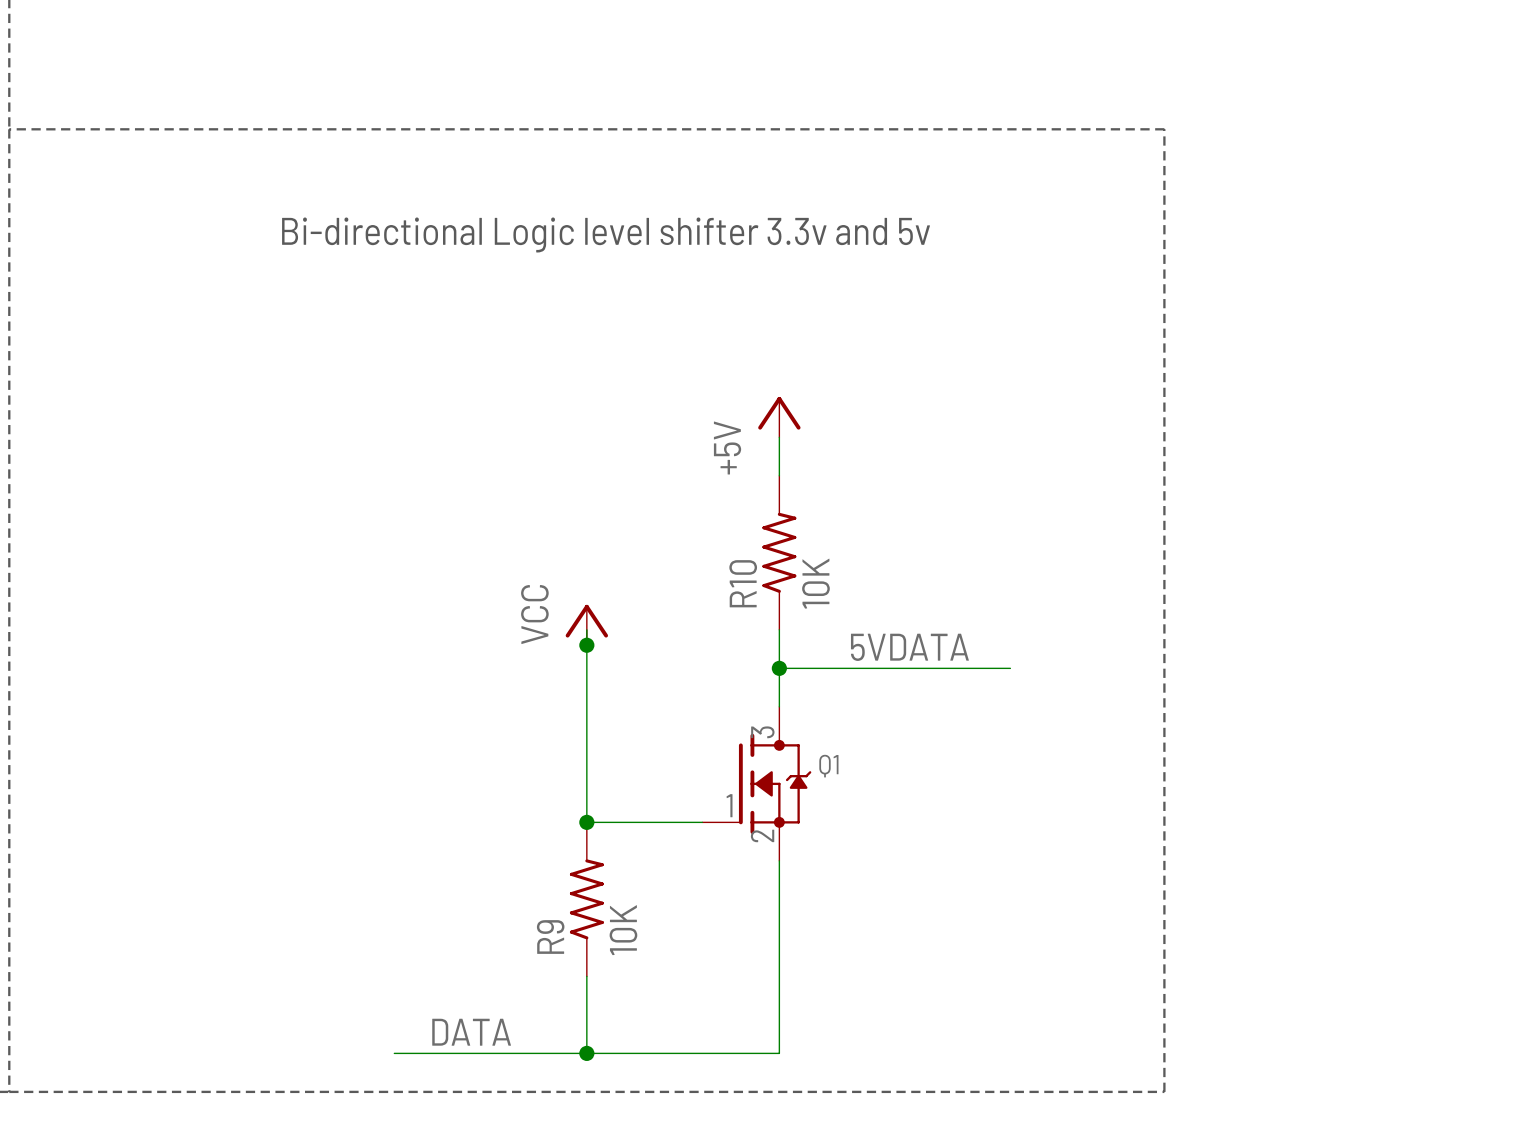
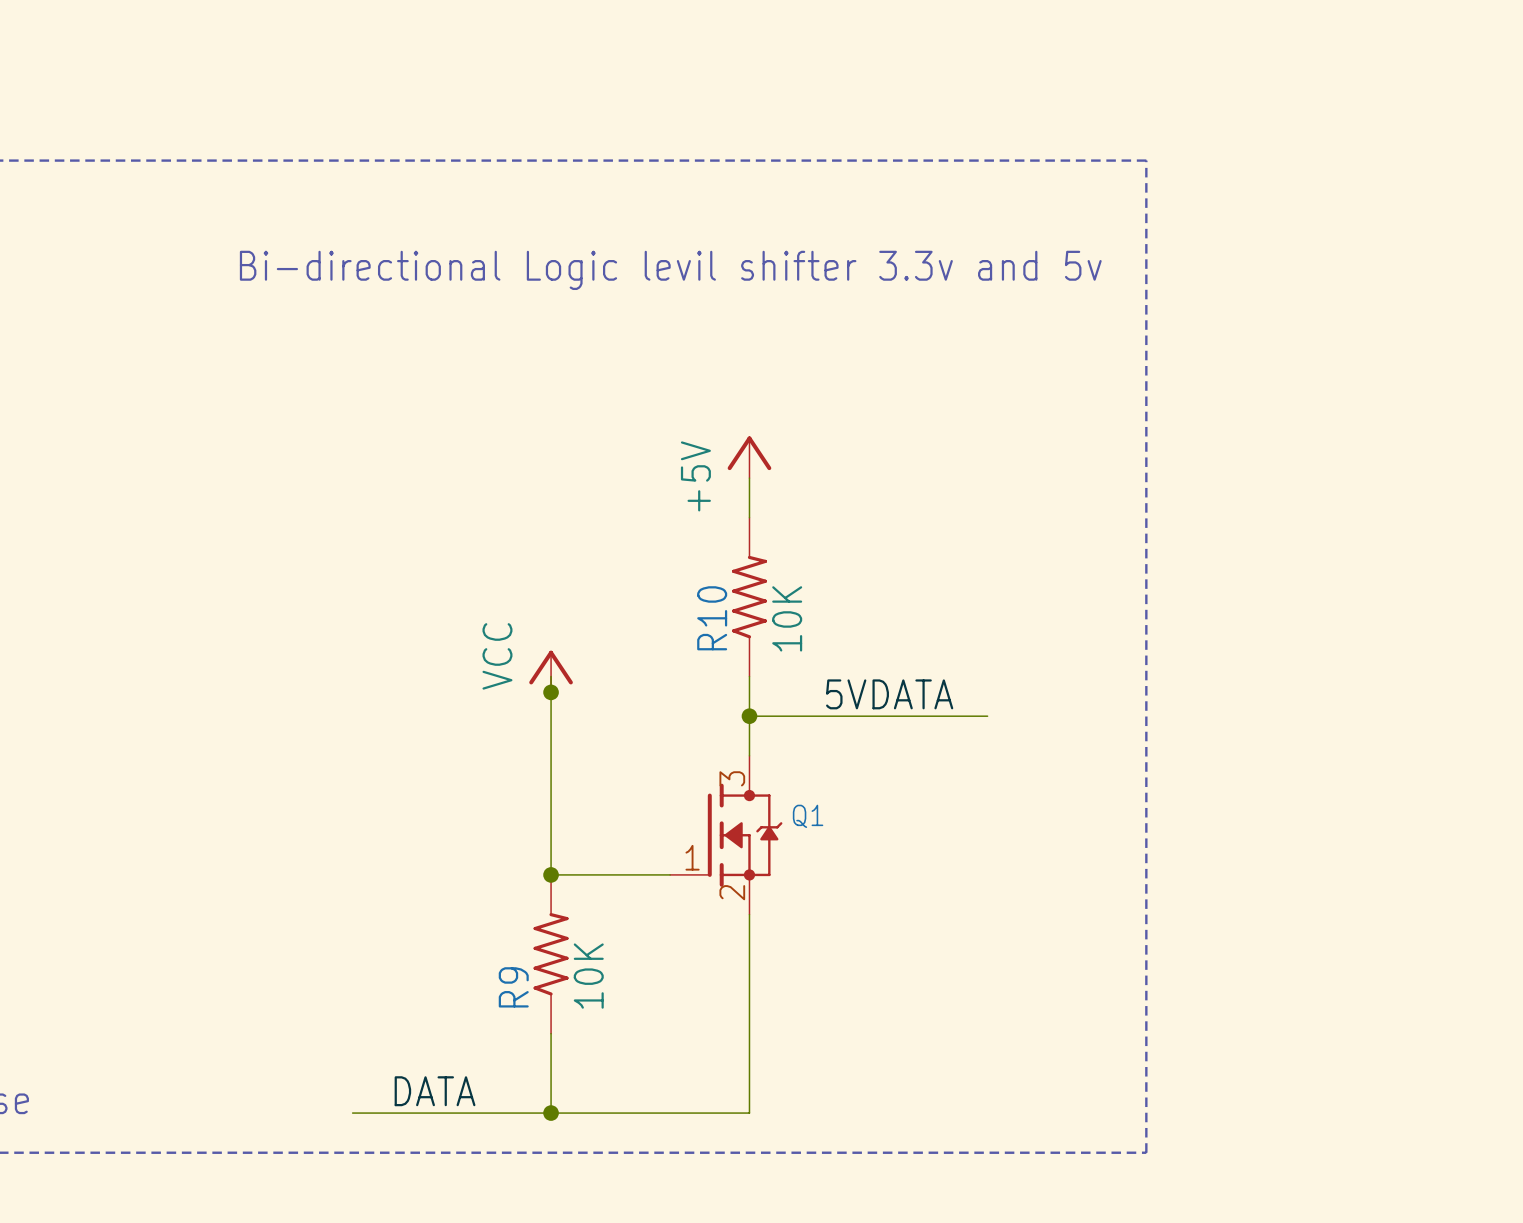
text: Bi-directional Logic level shifter 3.3v and 5v (606, 234) -> Bi-directional Logic levil shifter 3.3v and 5v (670, 270)

